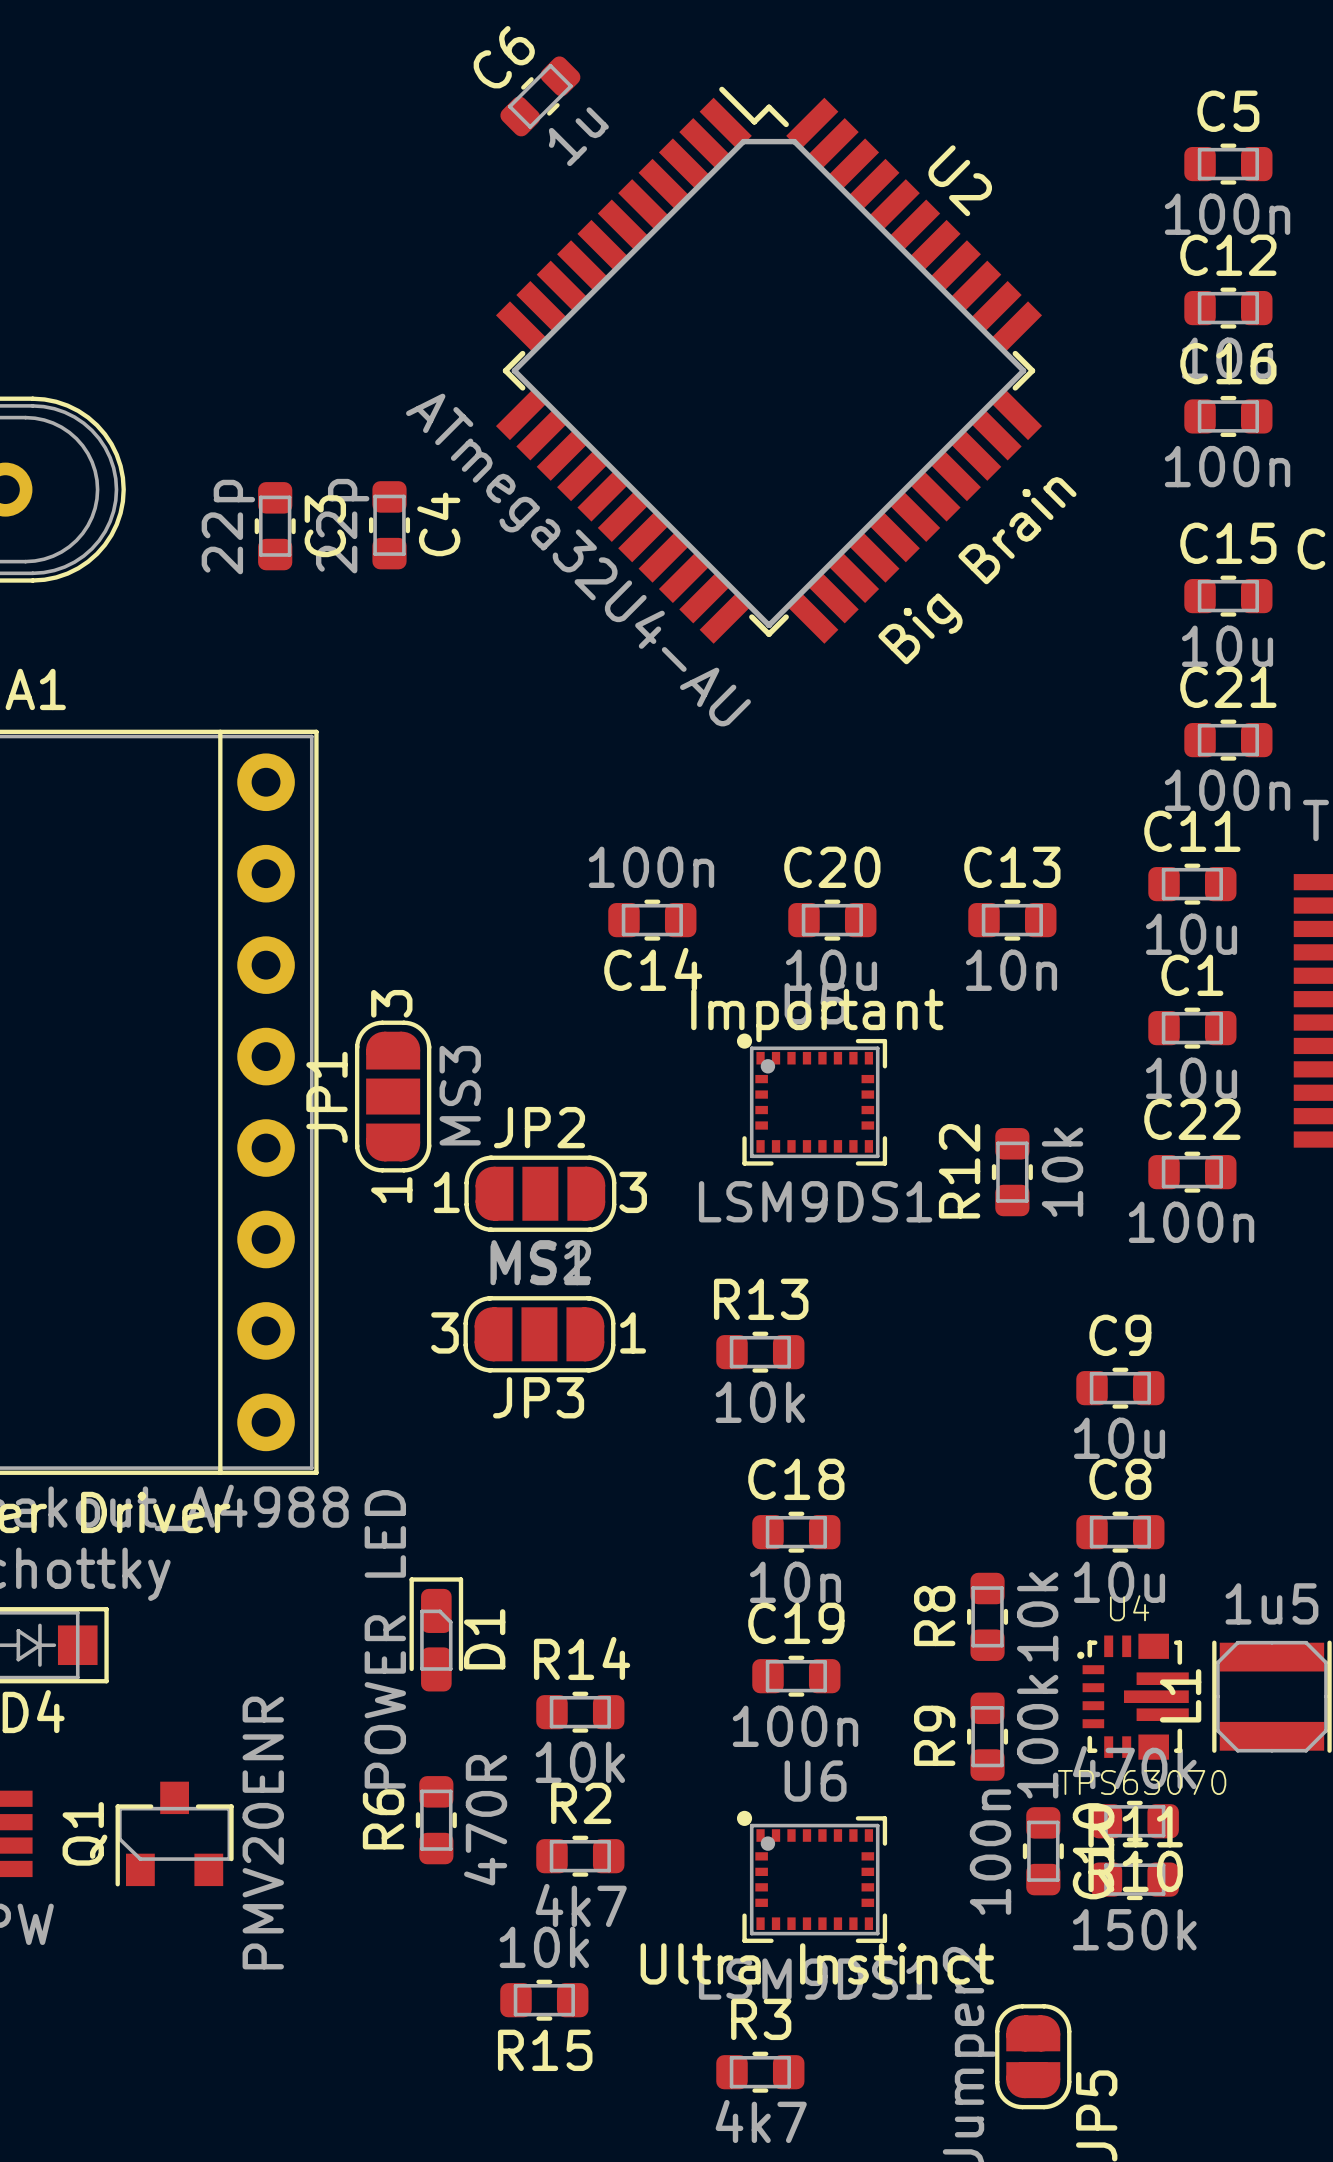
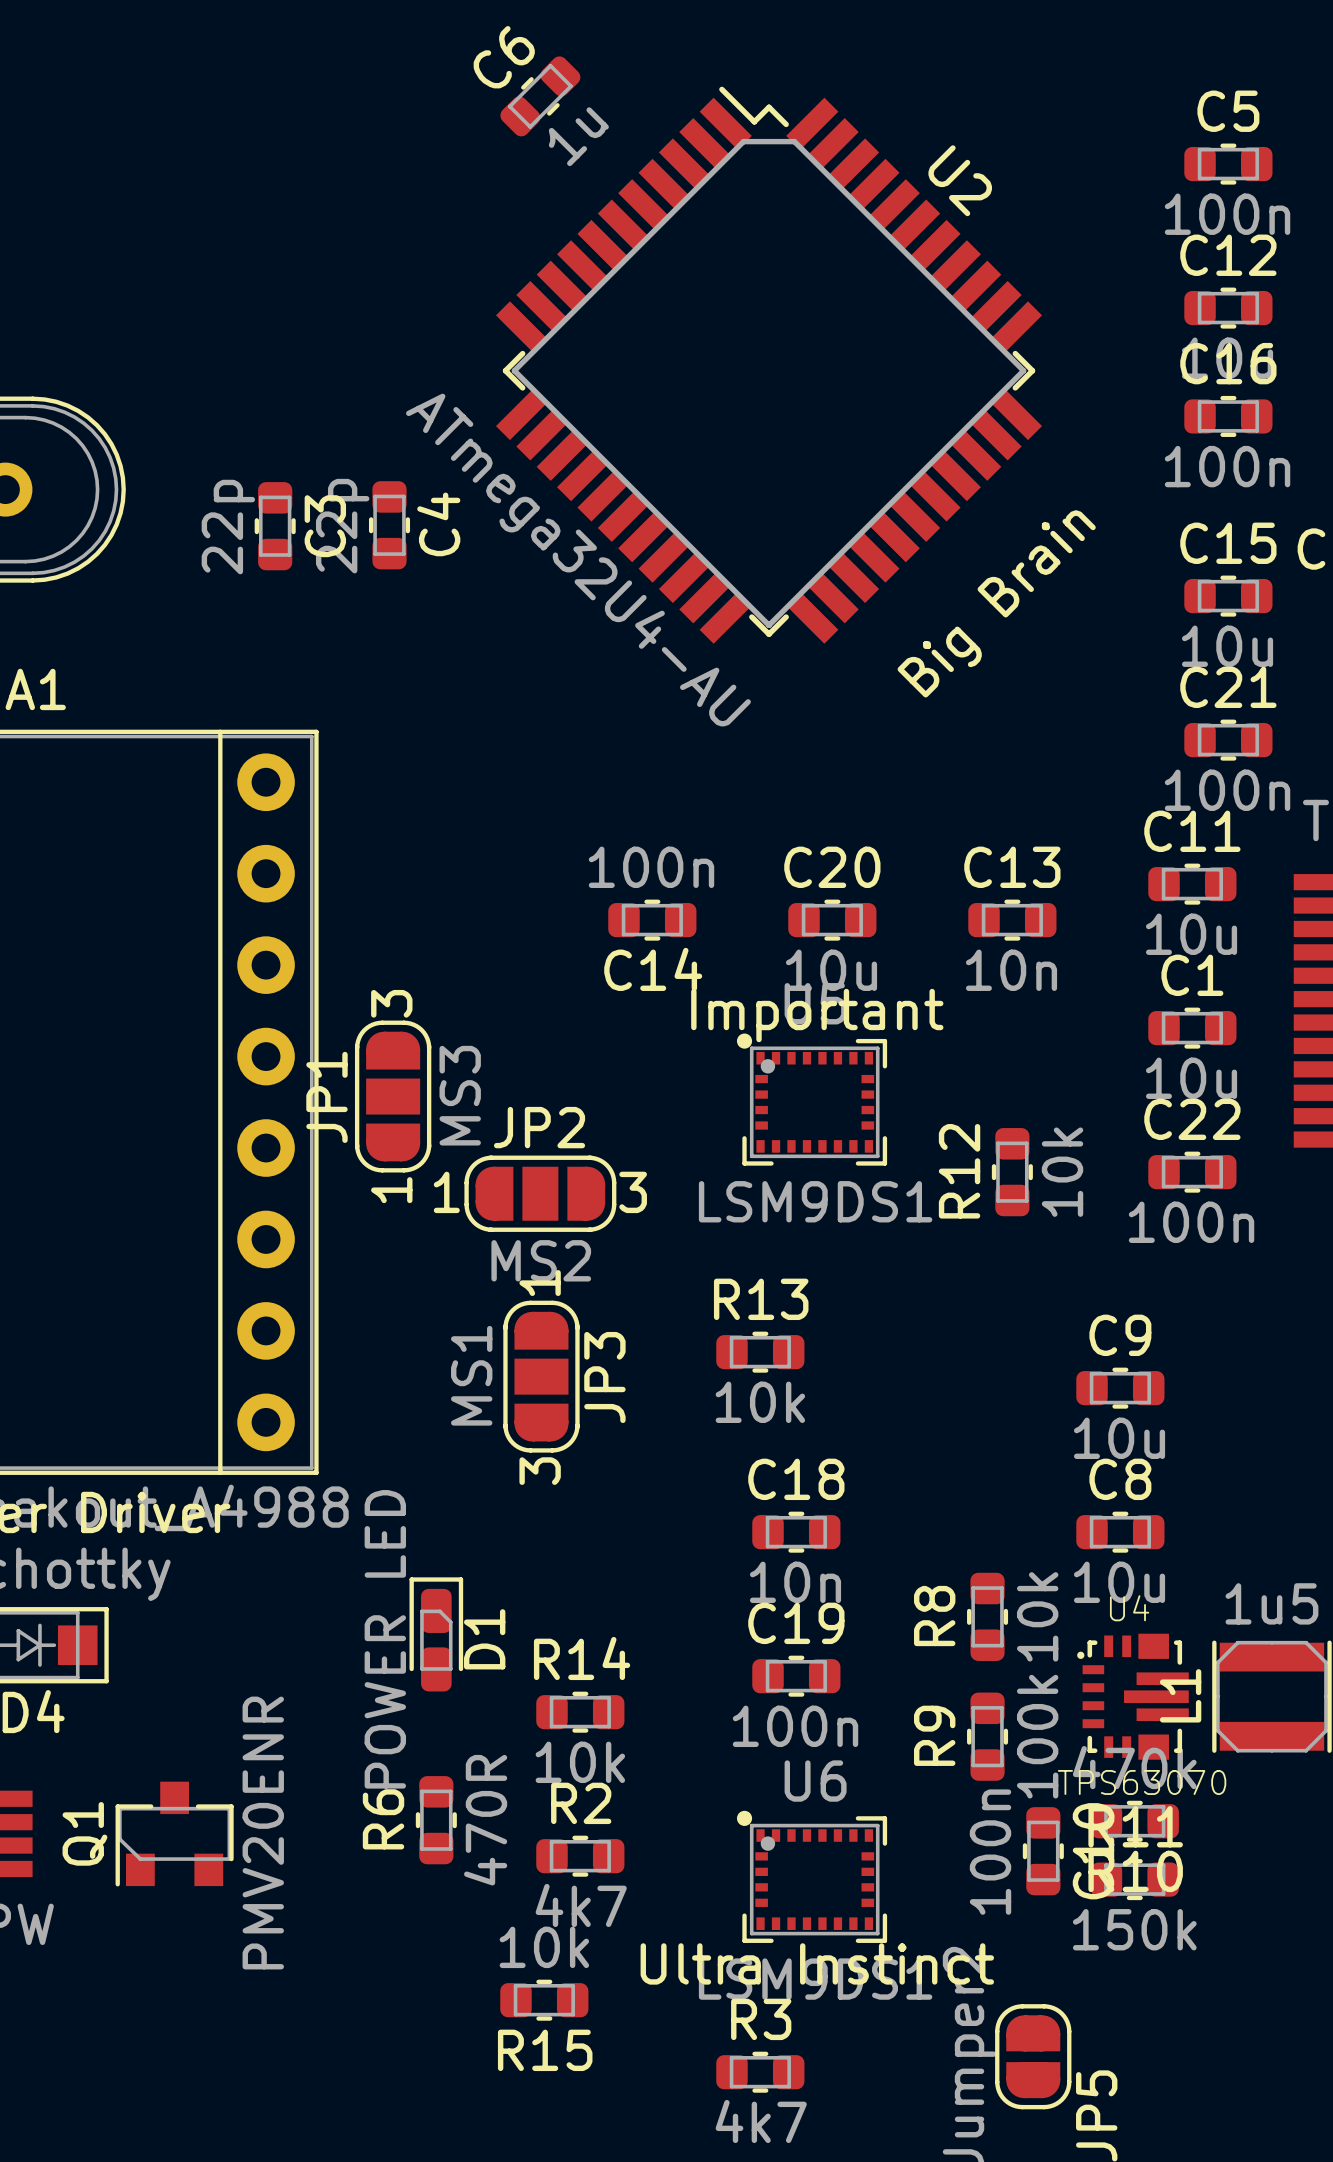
text position: Big Brain (977, 570) -> Big Brain (996, 603)
JP3 rotation: 0° (539, 1334) -> 90° counterclockwise (541, 1376)

